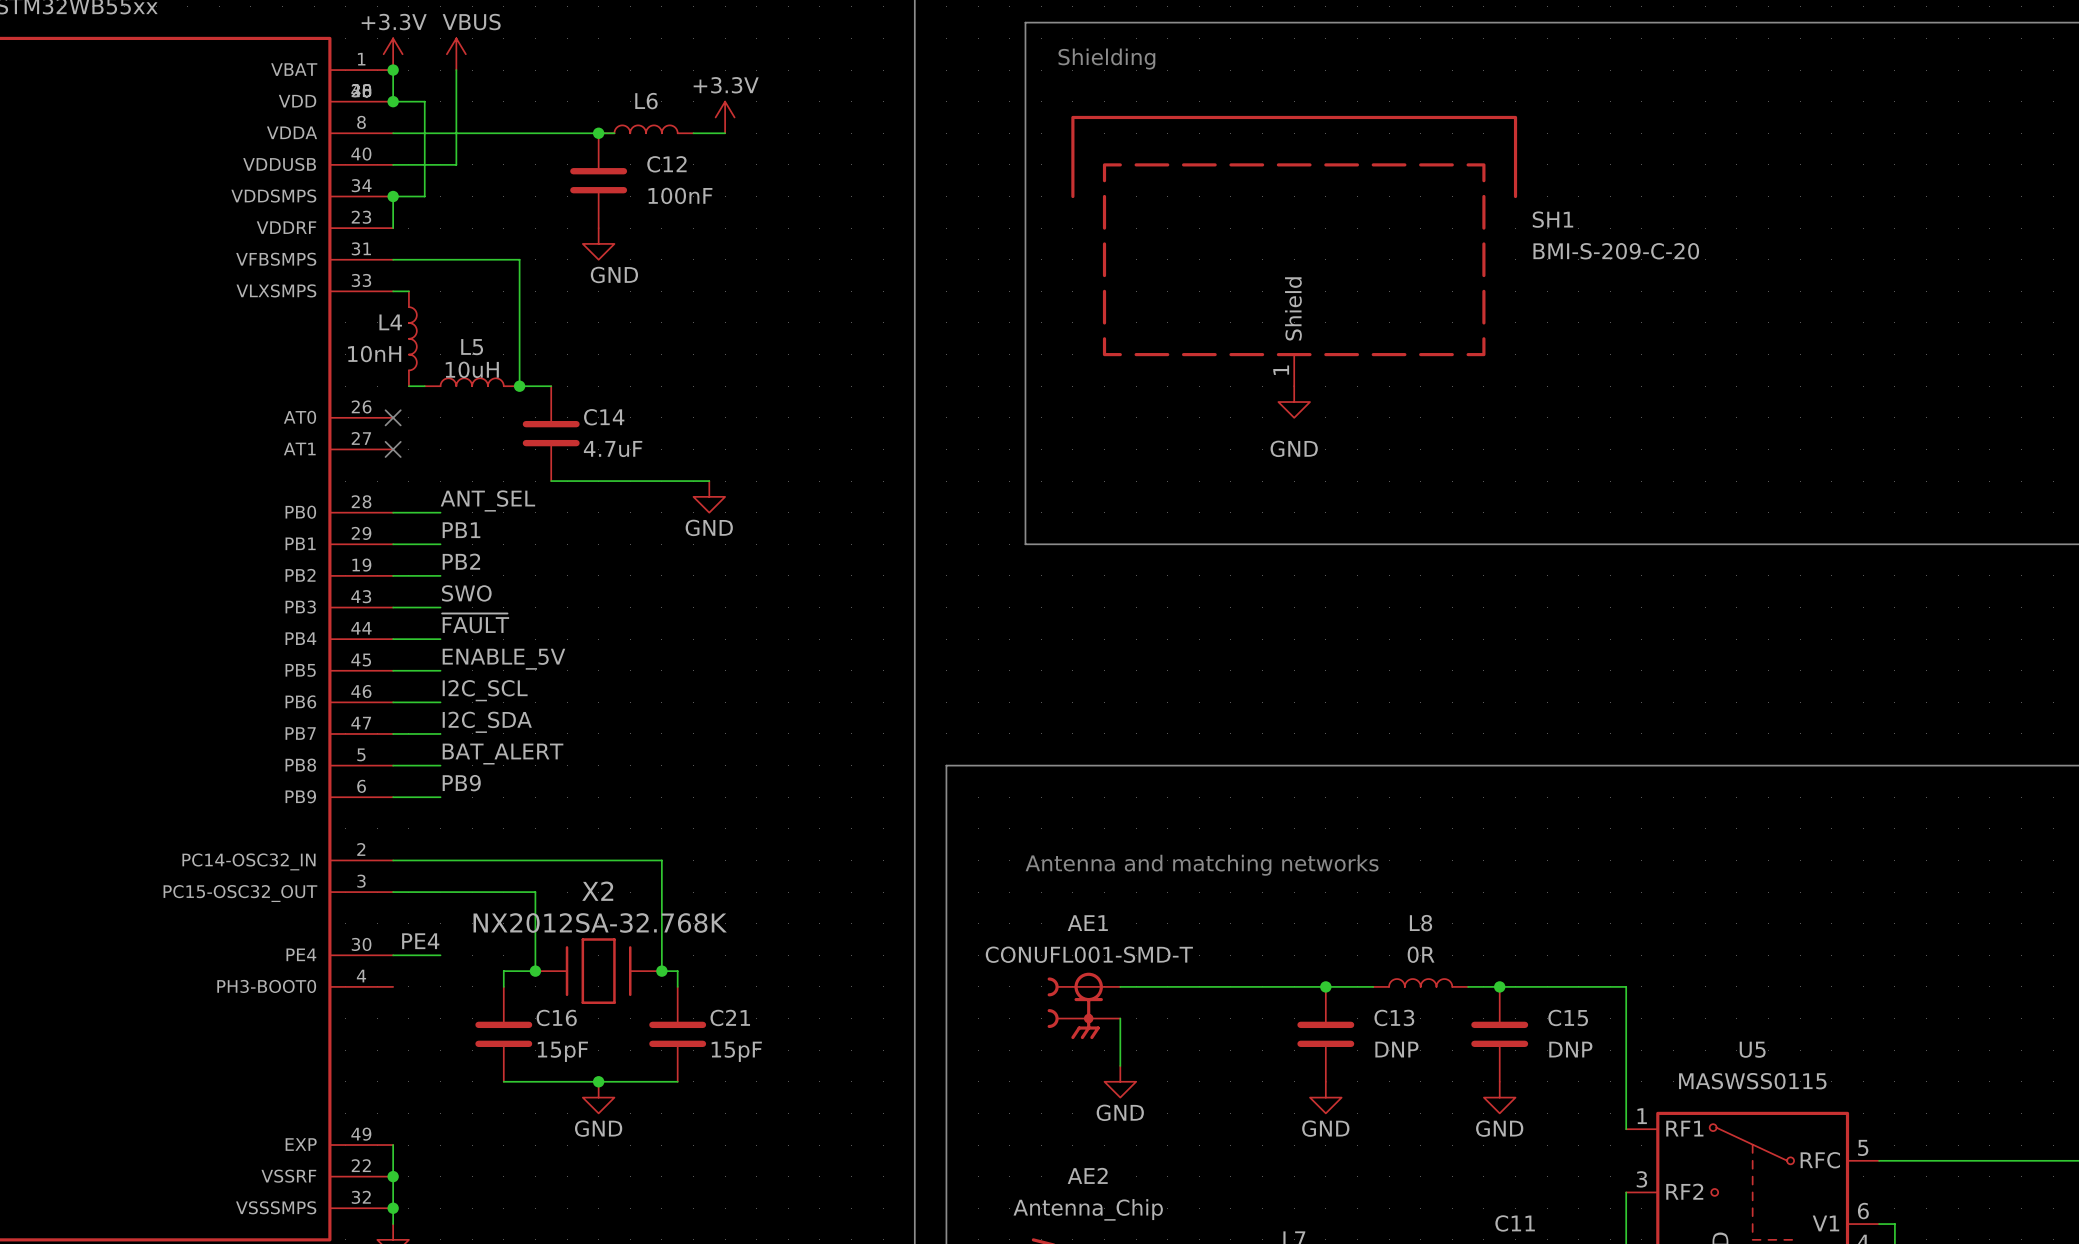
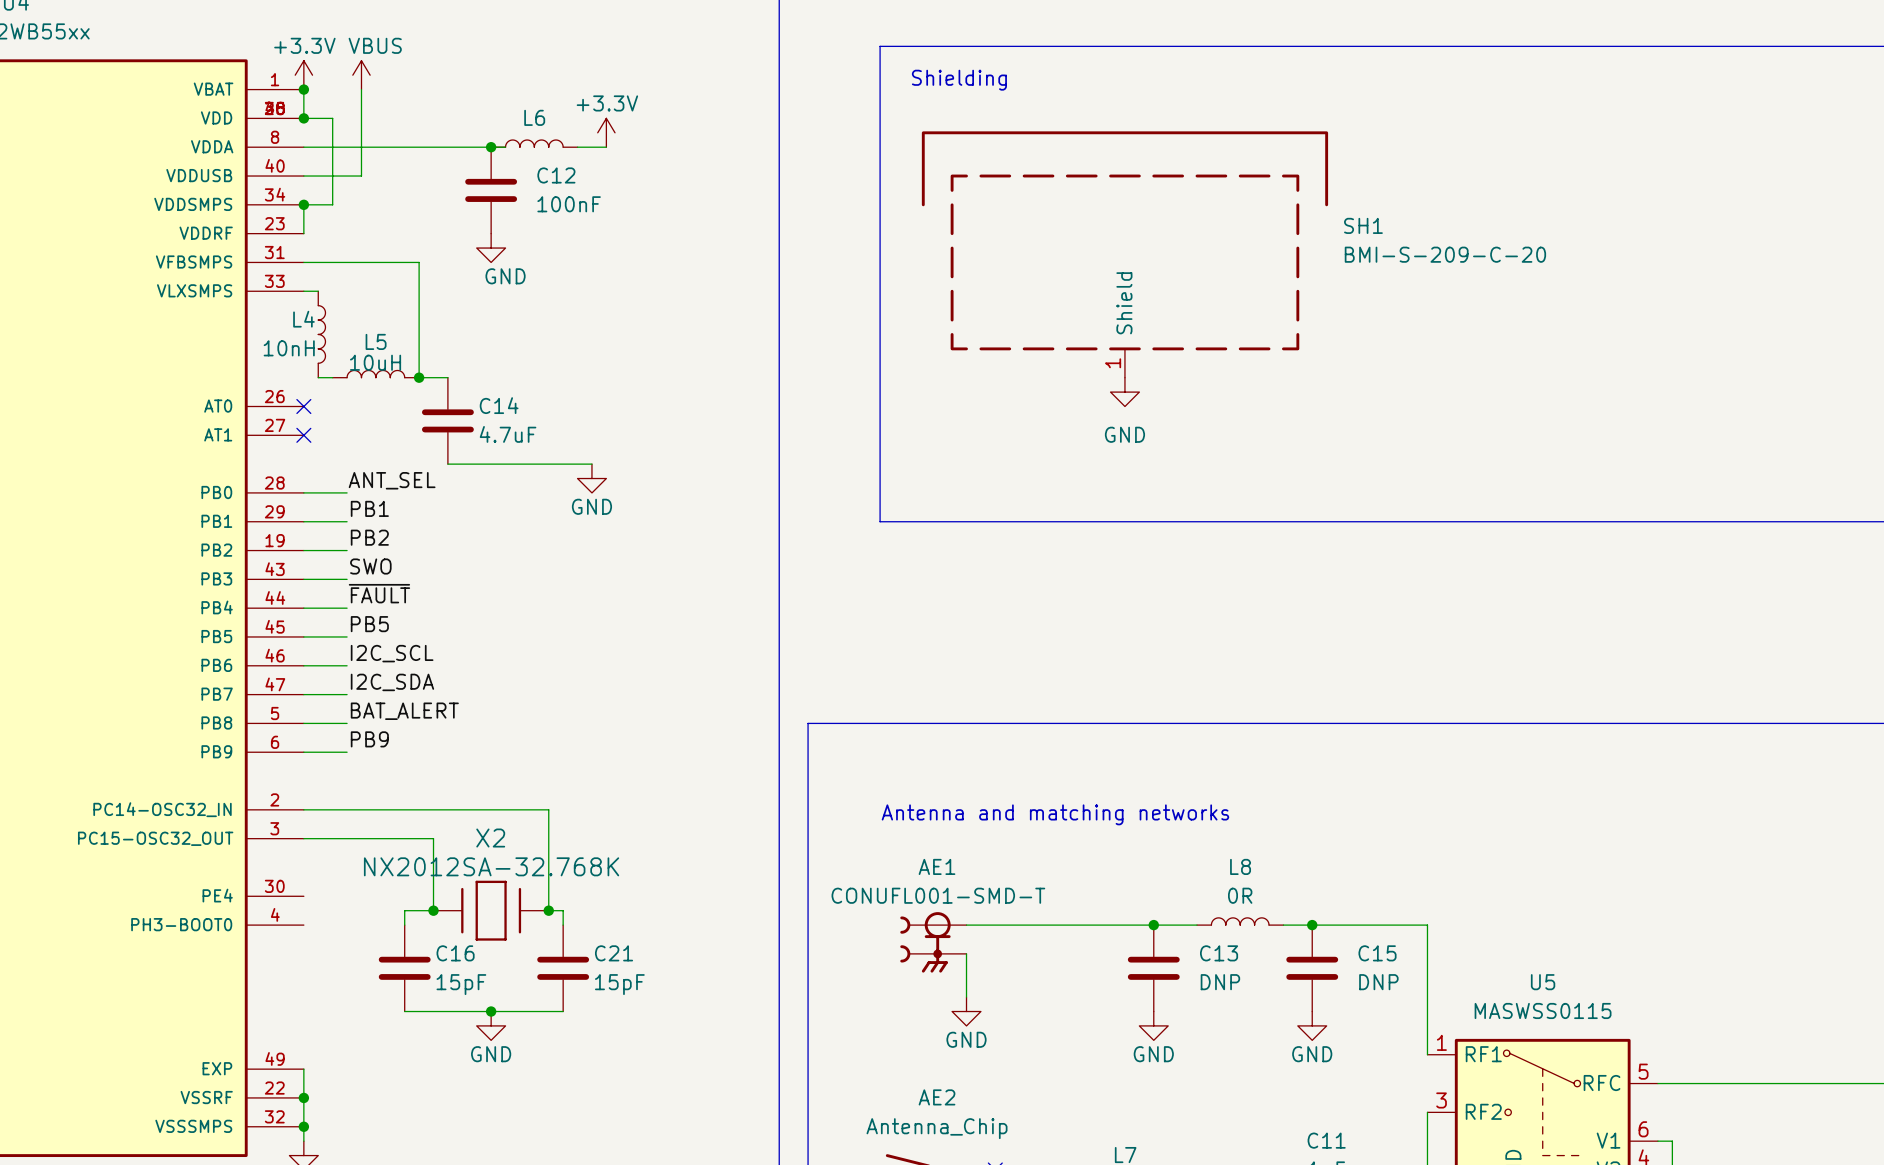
label: ENABLE_5V (503, 659) -> PB5 (369, 624)
label: PE4 (420, 941) -> none
wire: (393, 955) (440, 955) -> none

